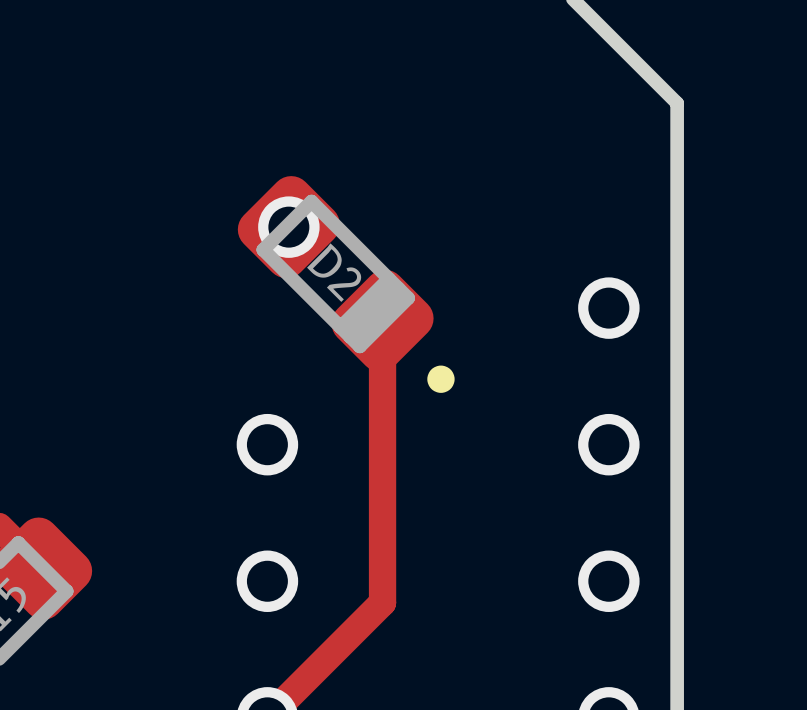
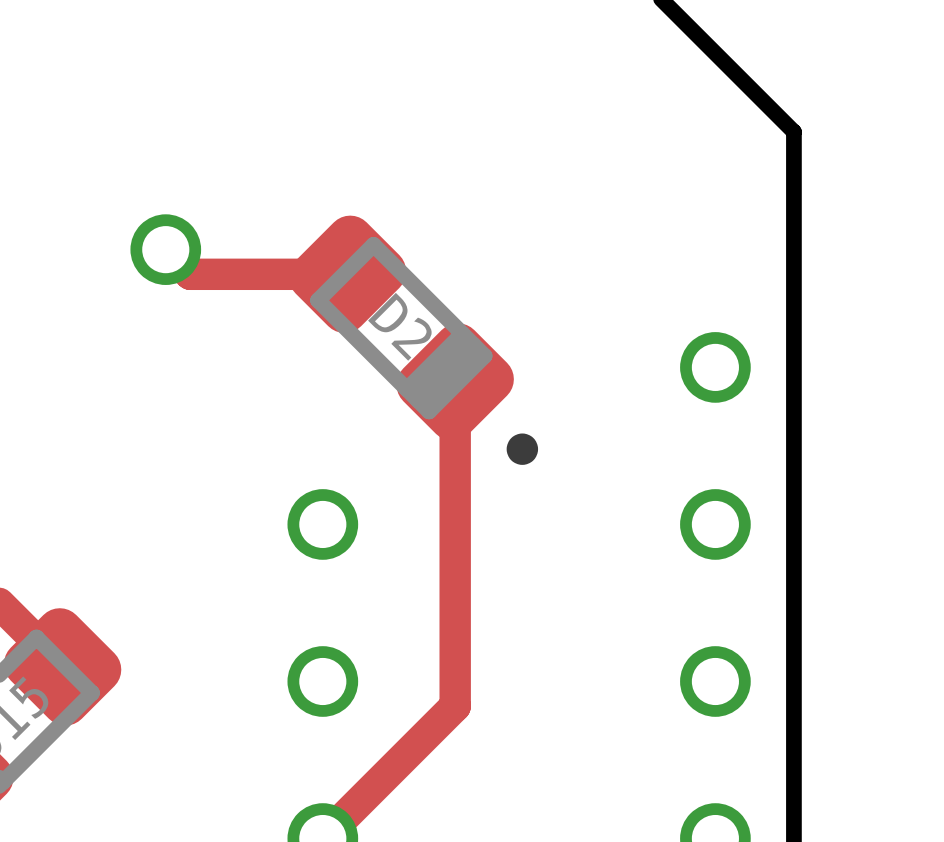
track: none -> (165, 249) (190, 274) (347, 274)
via position: (288, 227) -> (165, 249)

